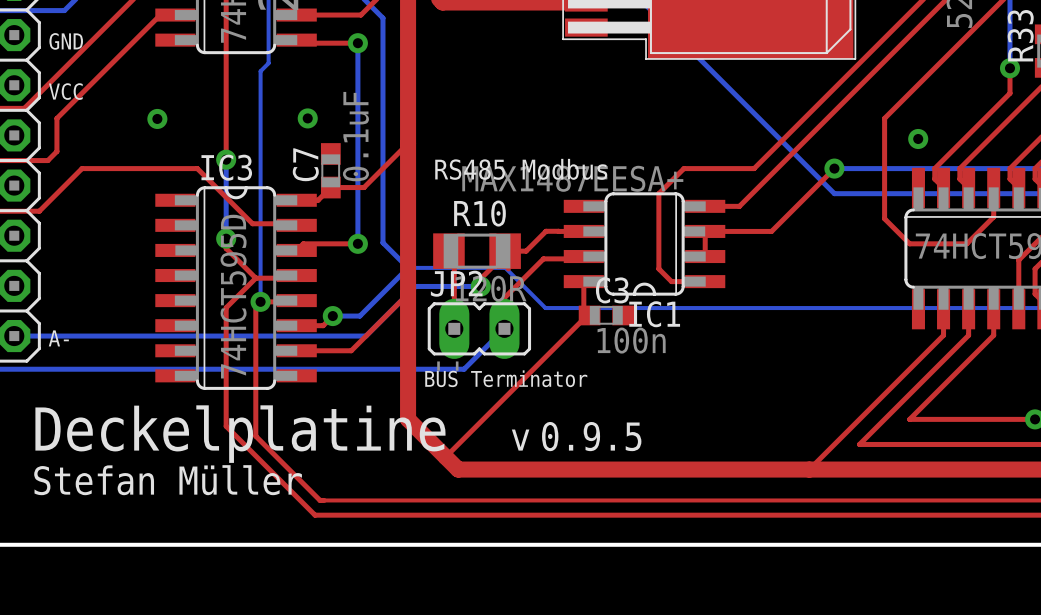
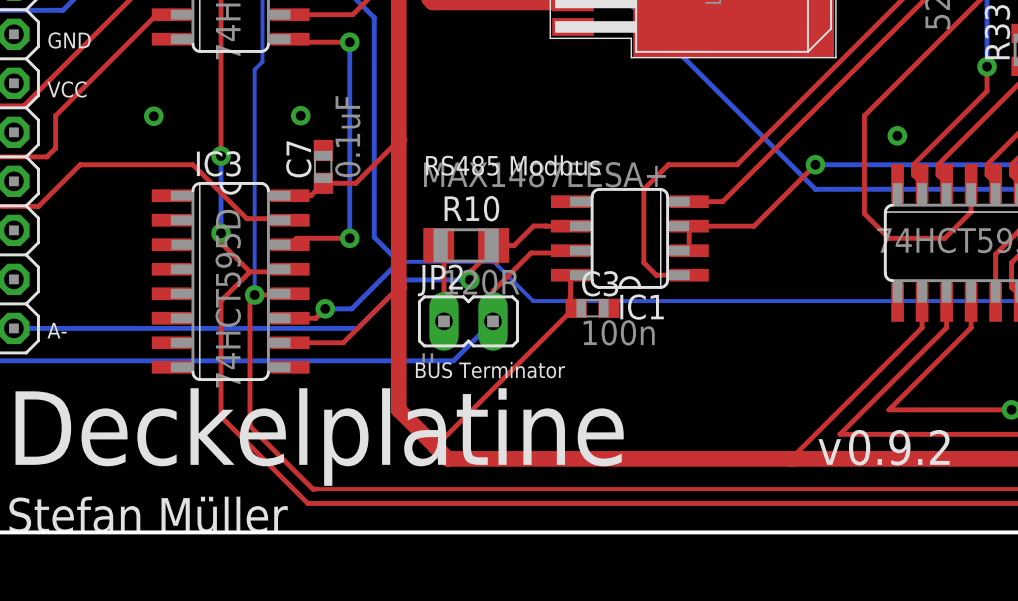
drawing: none -> [9, 388, 950, 534]
drawing: [34, 405, 642, 496] -> none

